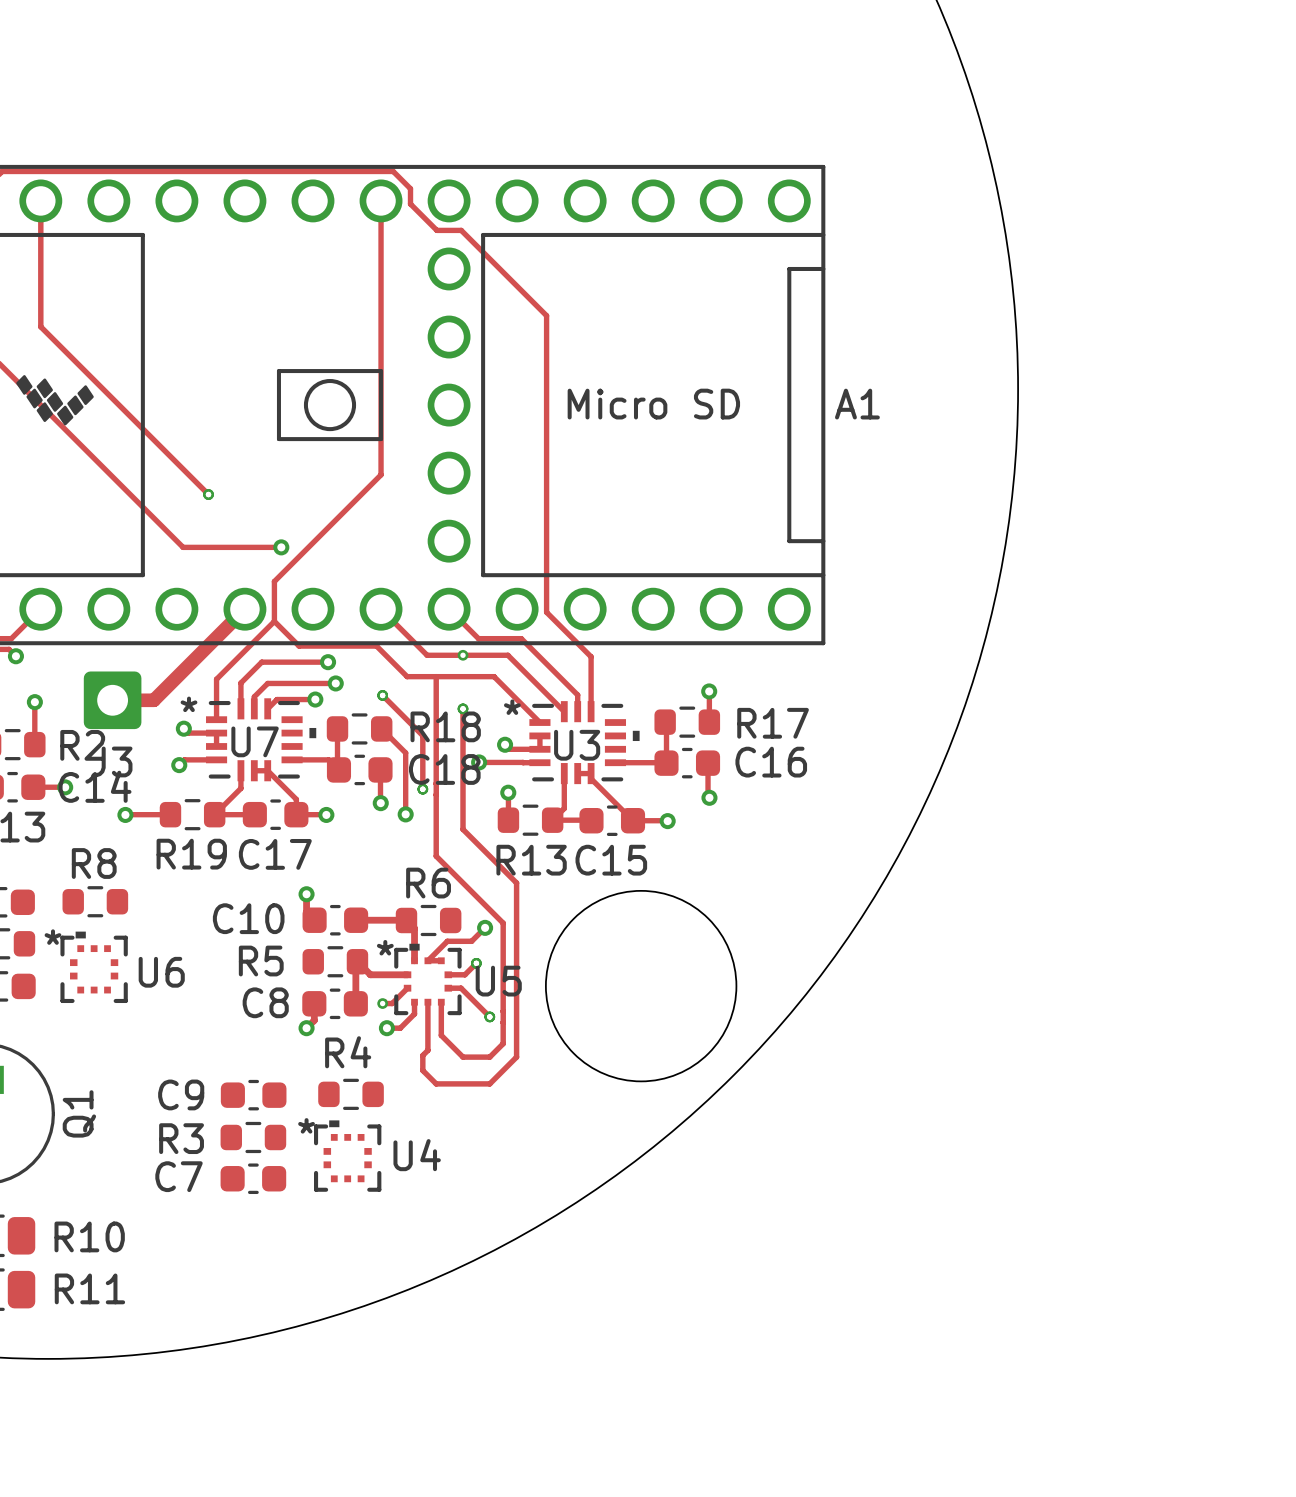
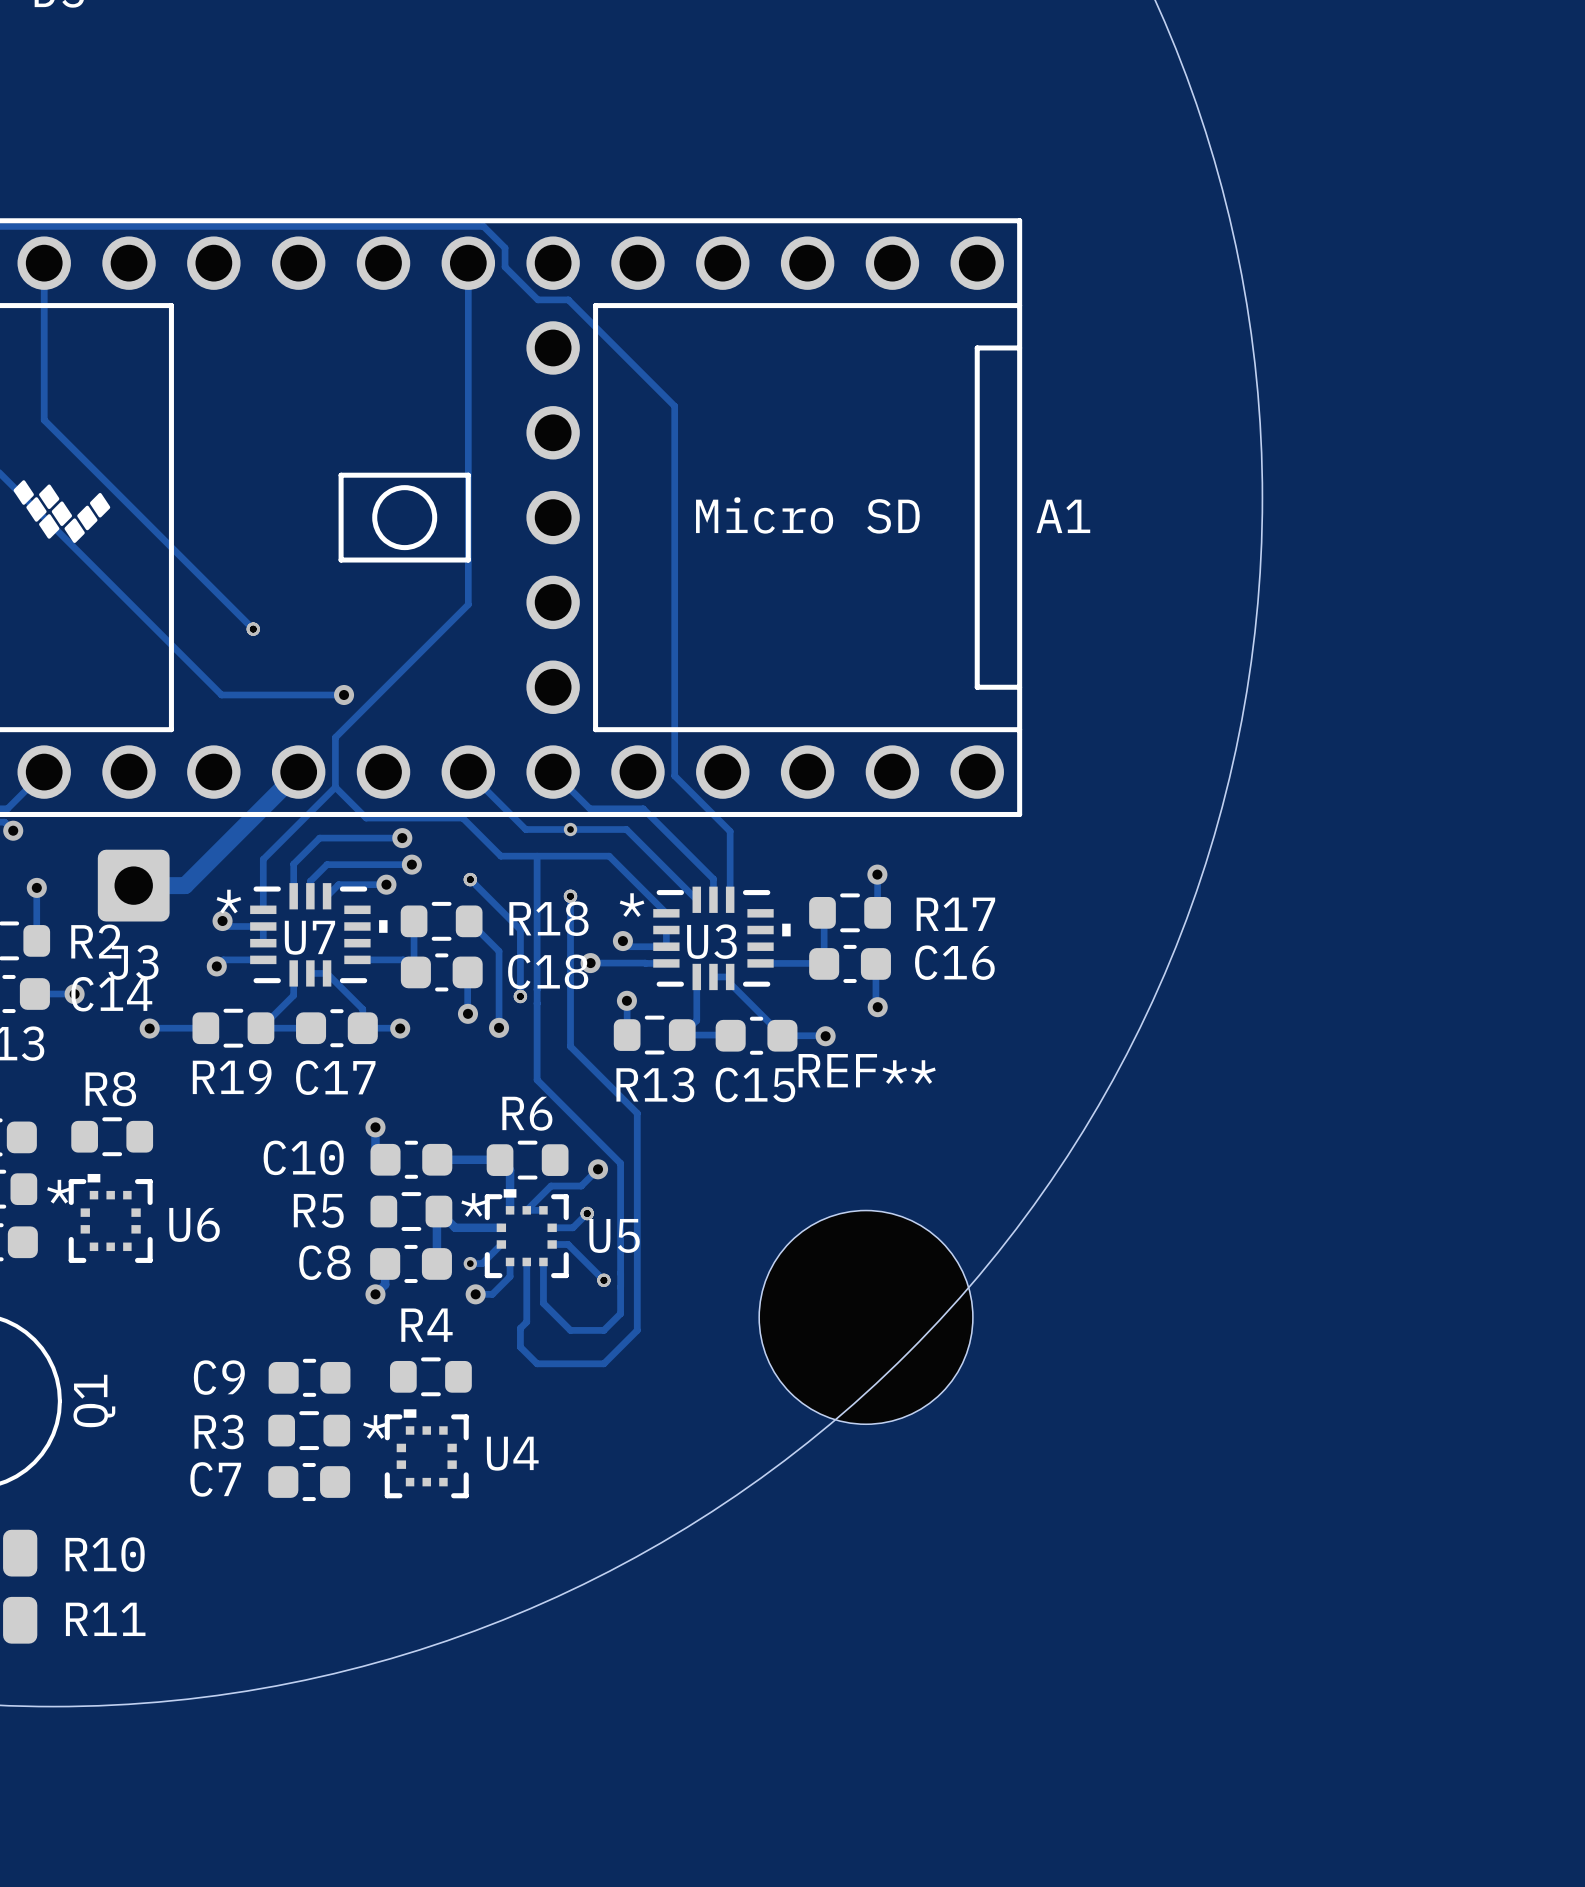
round board edge: [545, 890, 738, 1083] -> none
REF**: none -> (866, 1317)

